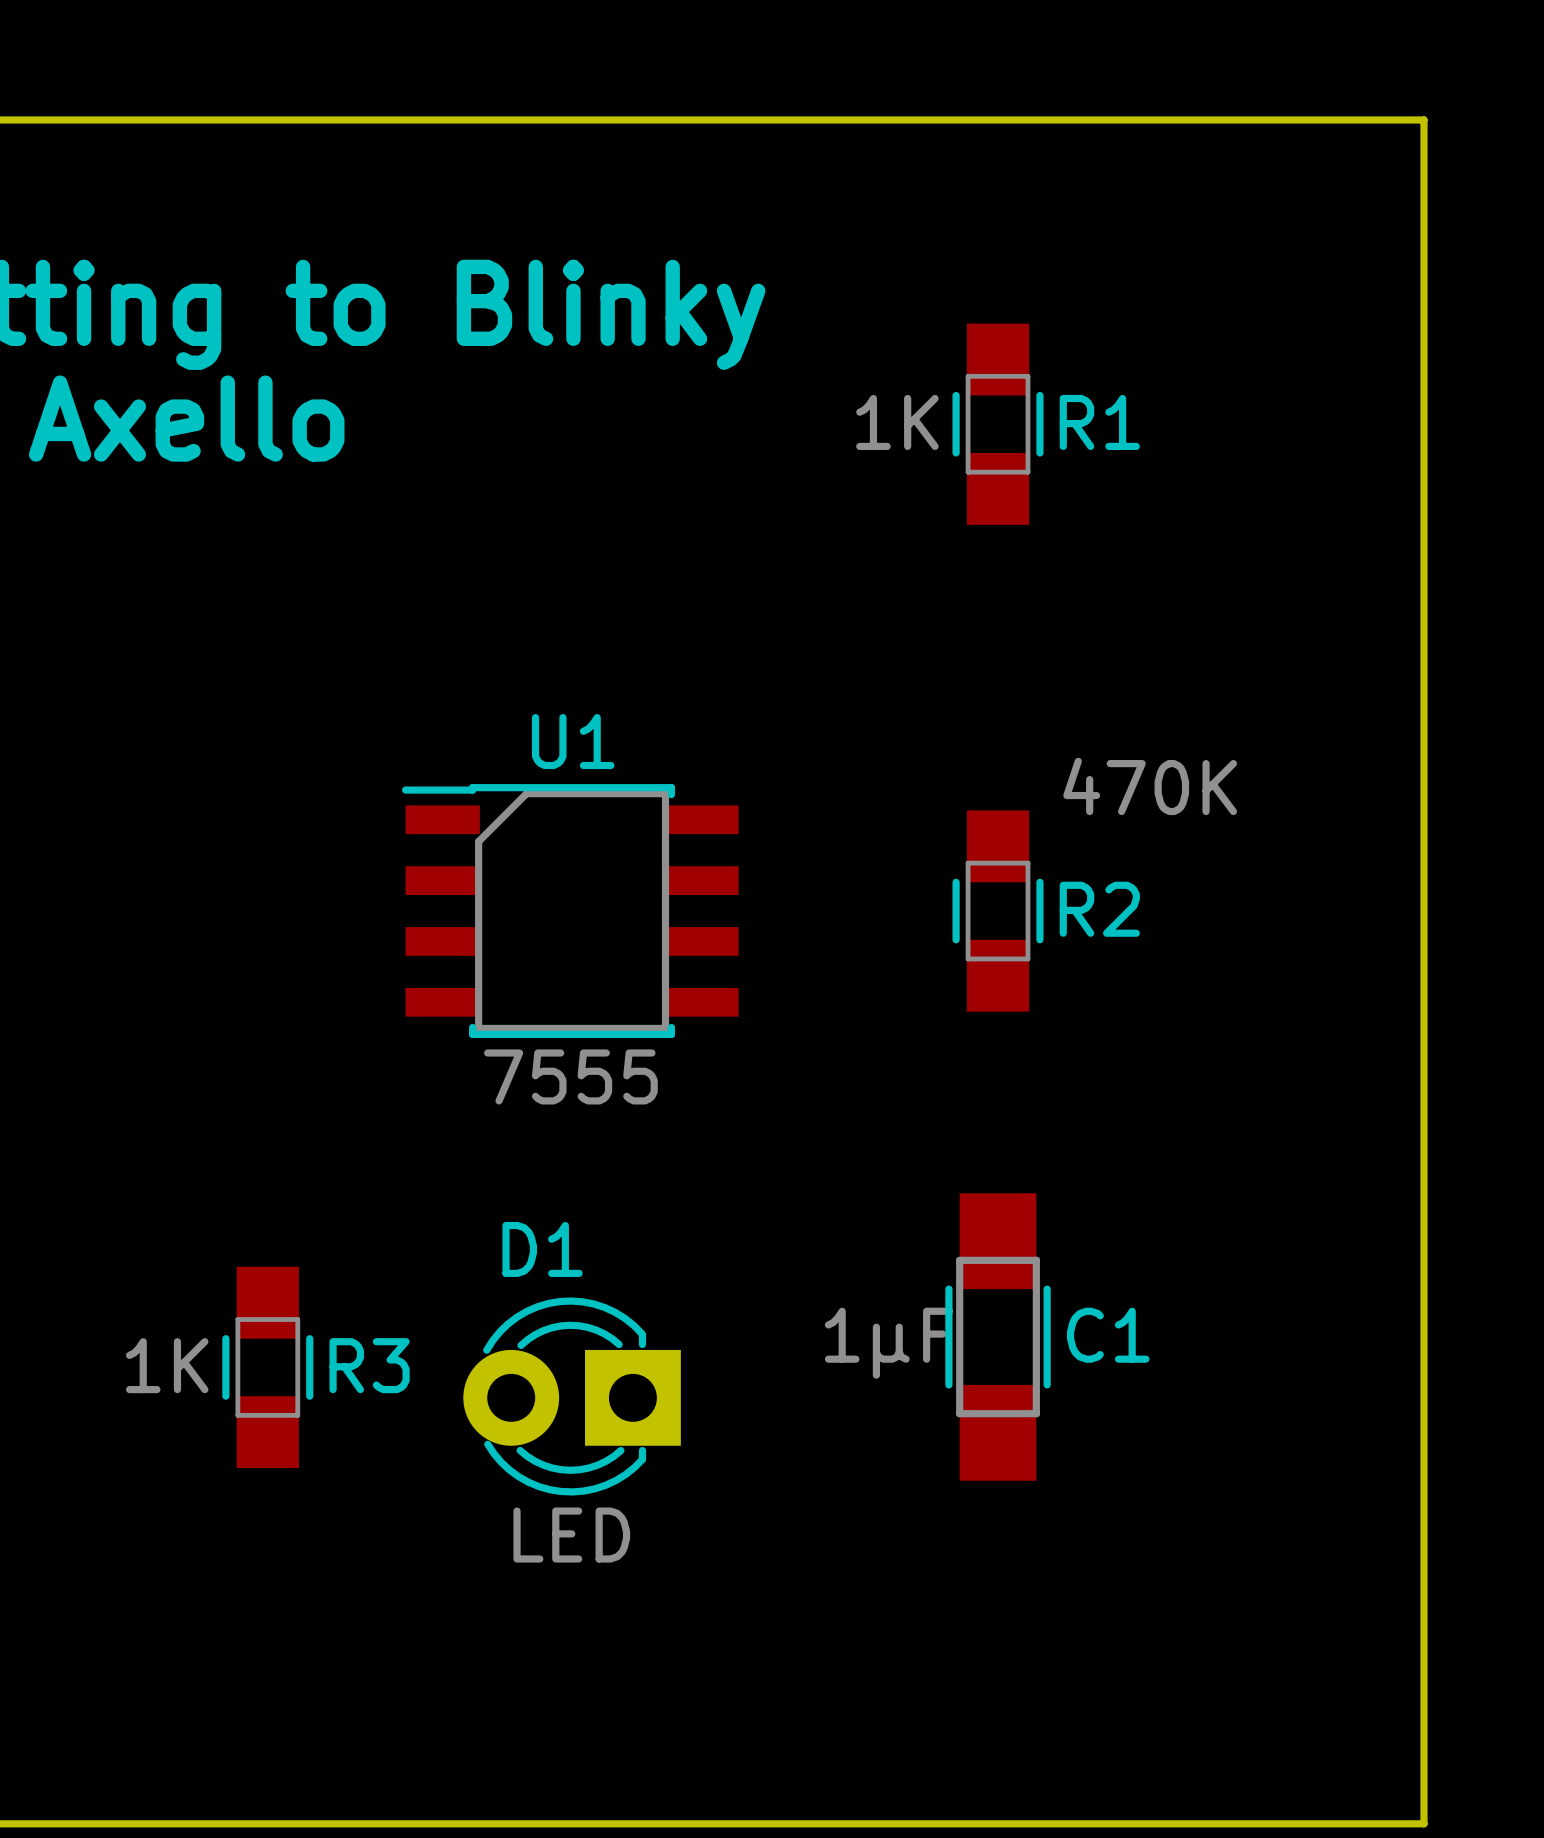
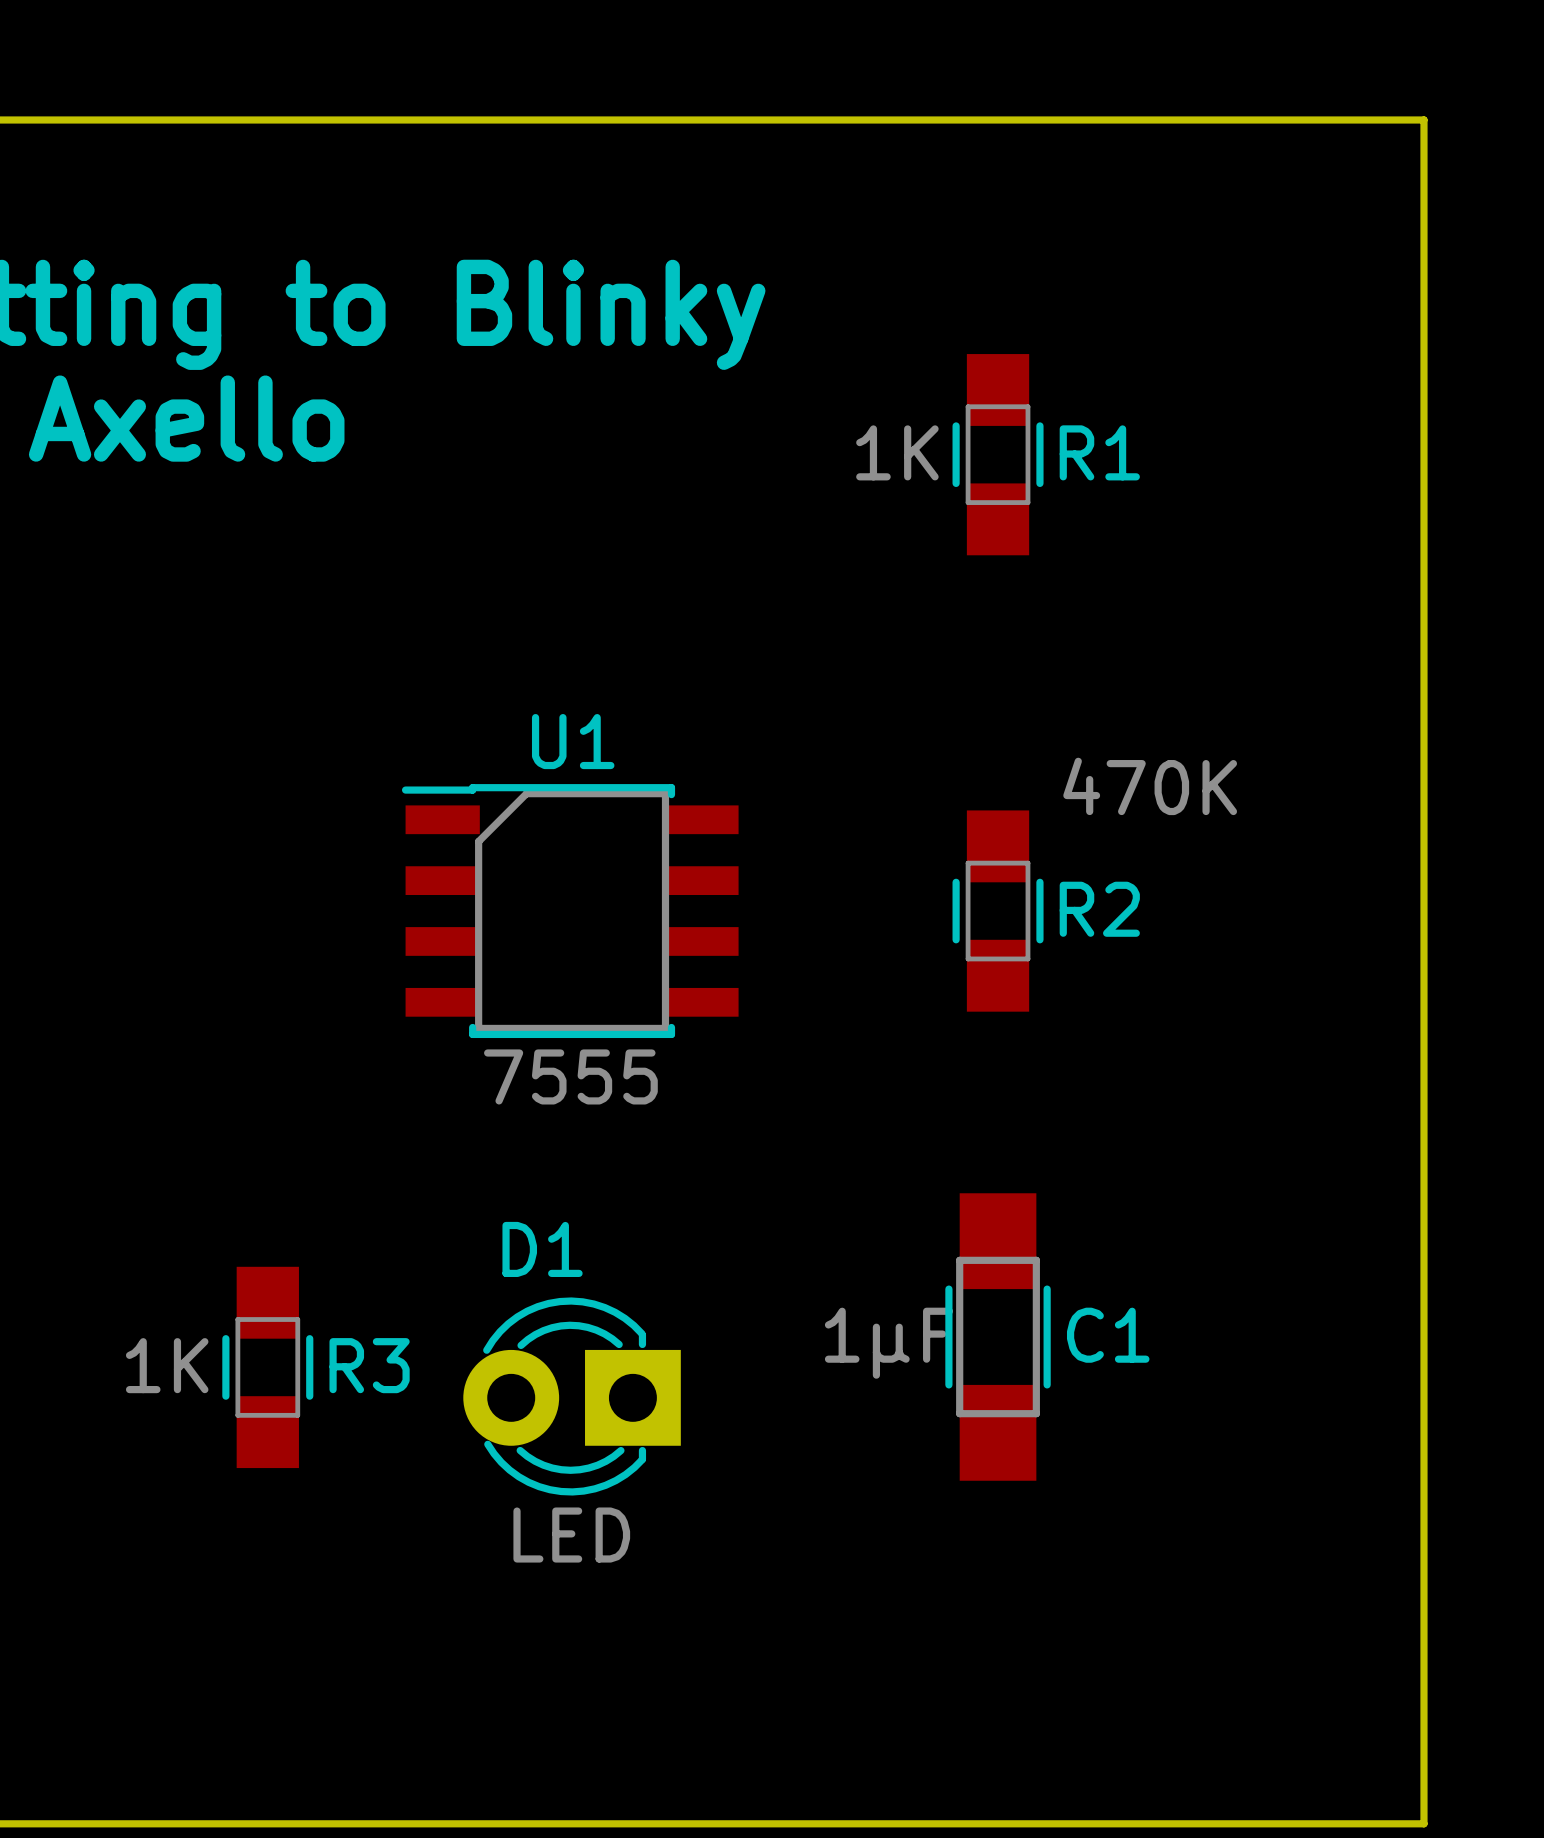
R1 position: (998, 424) -> (998, 454)

